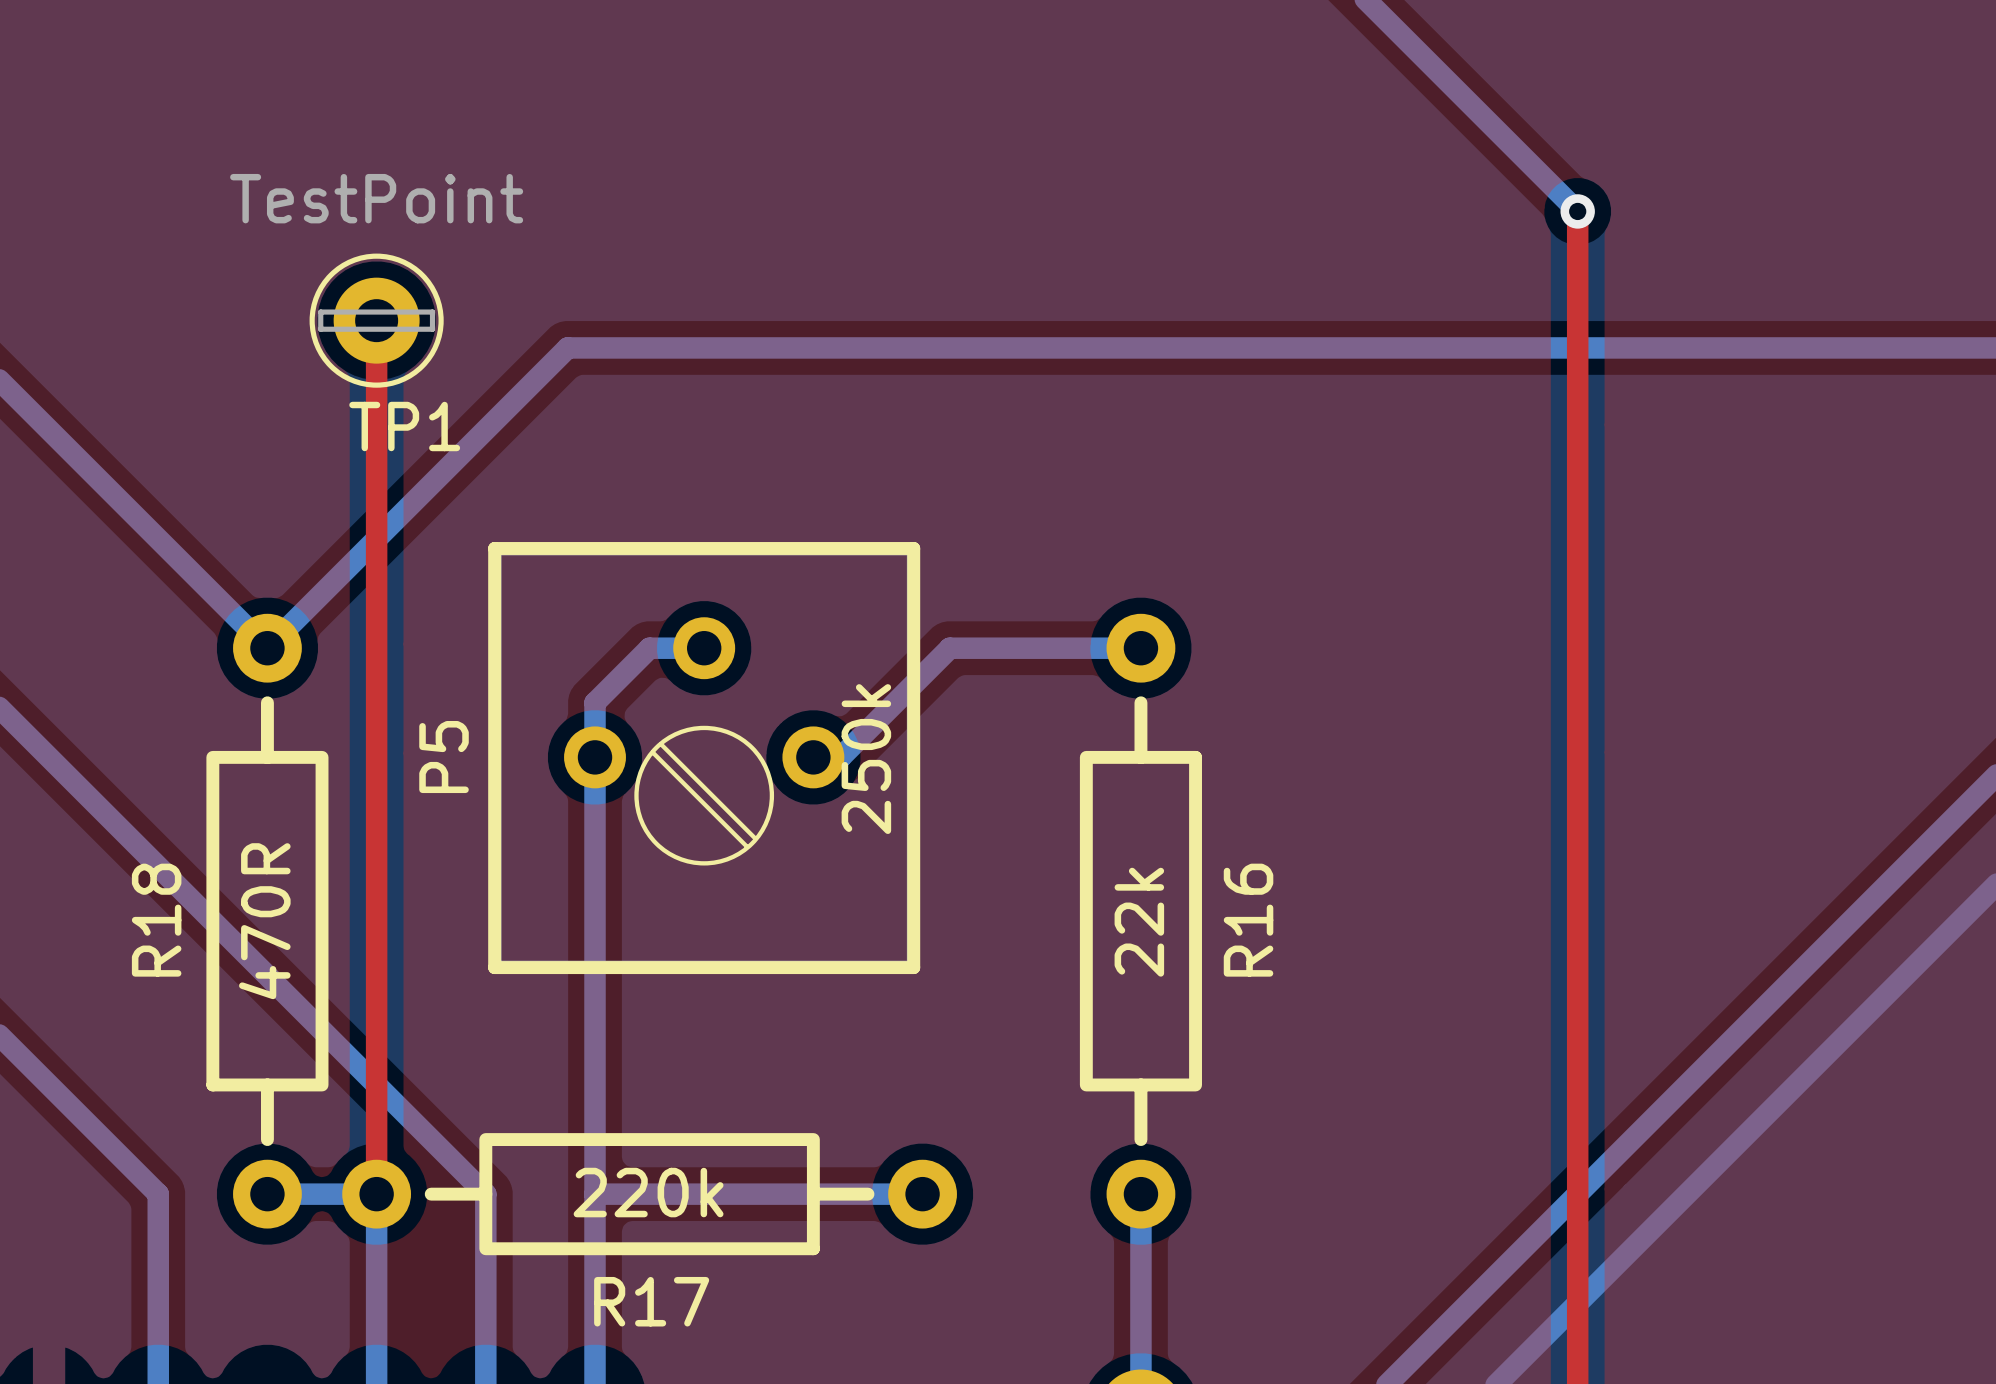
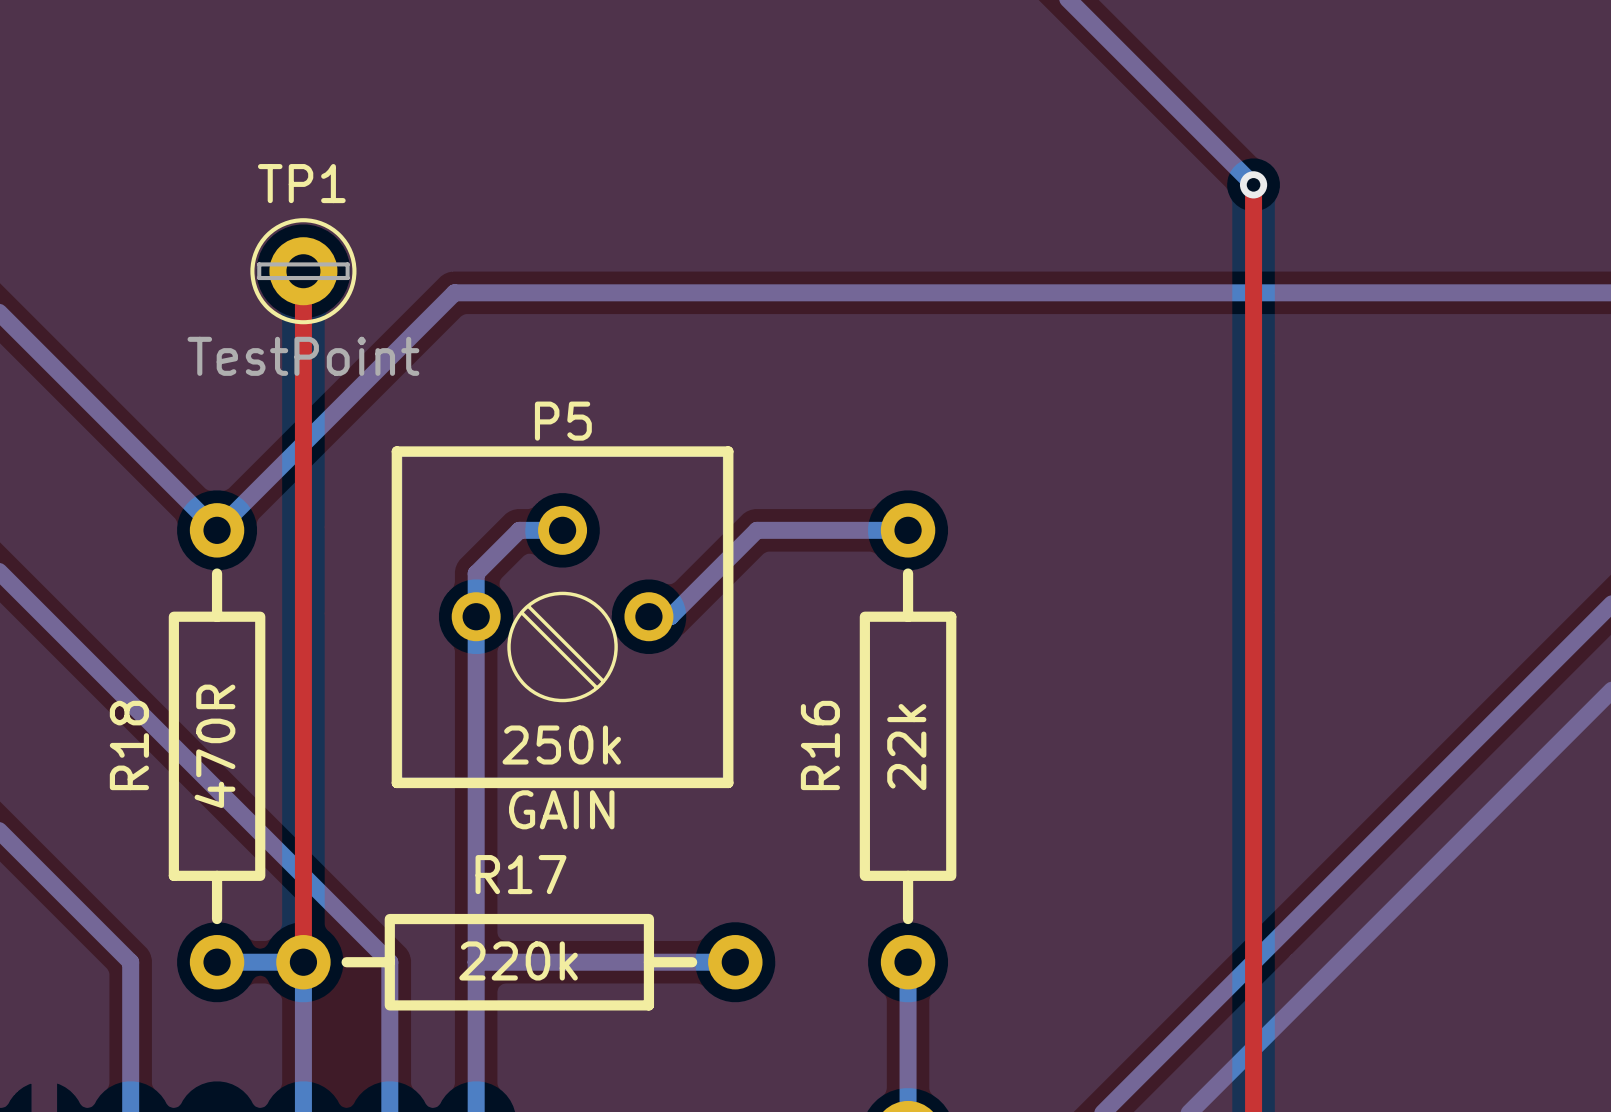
TP1 value position: TestPoint (376, 198) -> TestPoint (303, 356)
TP1 name position: TP1 (404, 426) -> TP1 (301, 183)
P5 name rotation: 0° (444, 757) -> 90° clockwise (563, 421)
P5 name position: P5 (444, 757) -> P5 (563, 421)
P5 value rotation: 0° (866, 759) -> 90° clockwise (561, 745)
P5 value position: 250k (866, 759) -> 250k (561, 745)
R16 name position: R16 (1248, 920) -> R16 (820, 745)
P5 text: none -> GAIN (561, 809)
R17 name position: R17 (651, 1301) -> R17 (520, 874)

